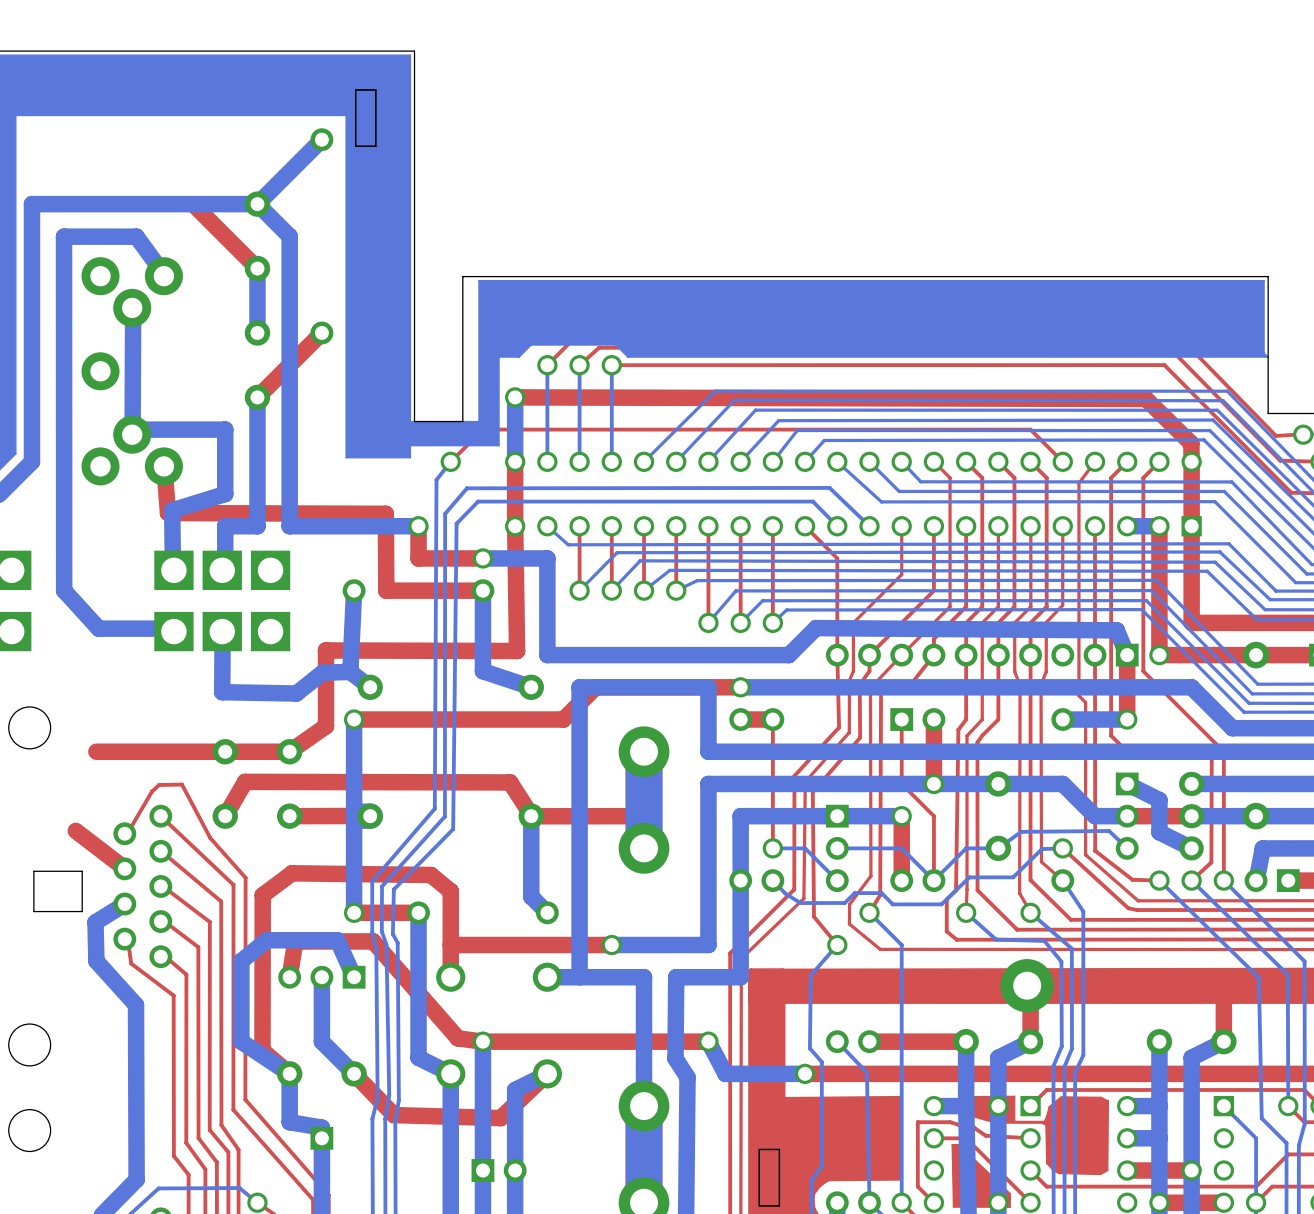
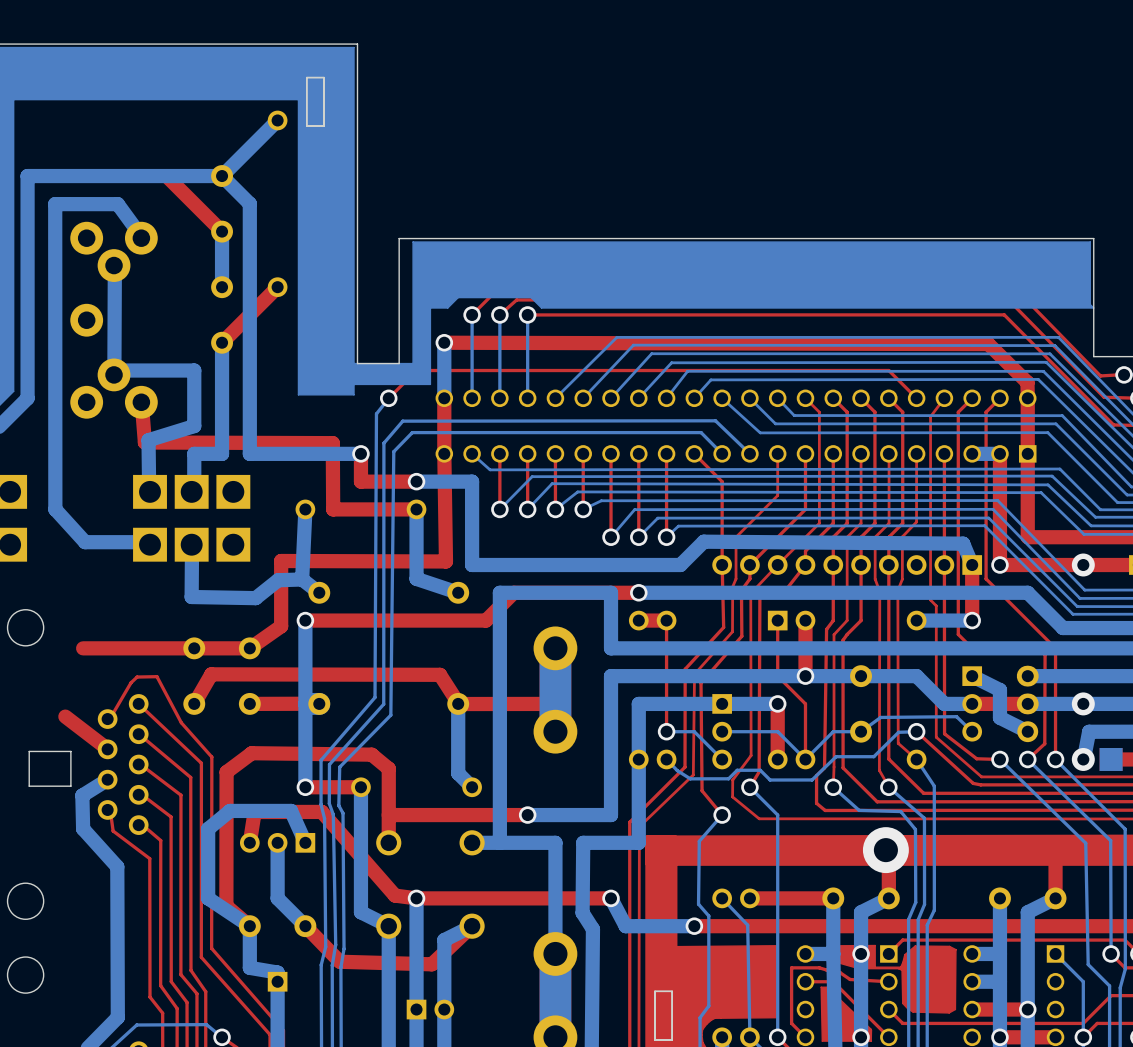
drawing: none -> [1099, 747, 1123, 771]
via: none -> (1083, 759)
part: (1272, 880) -> none

